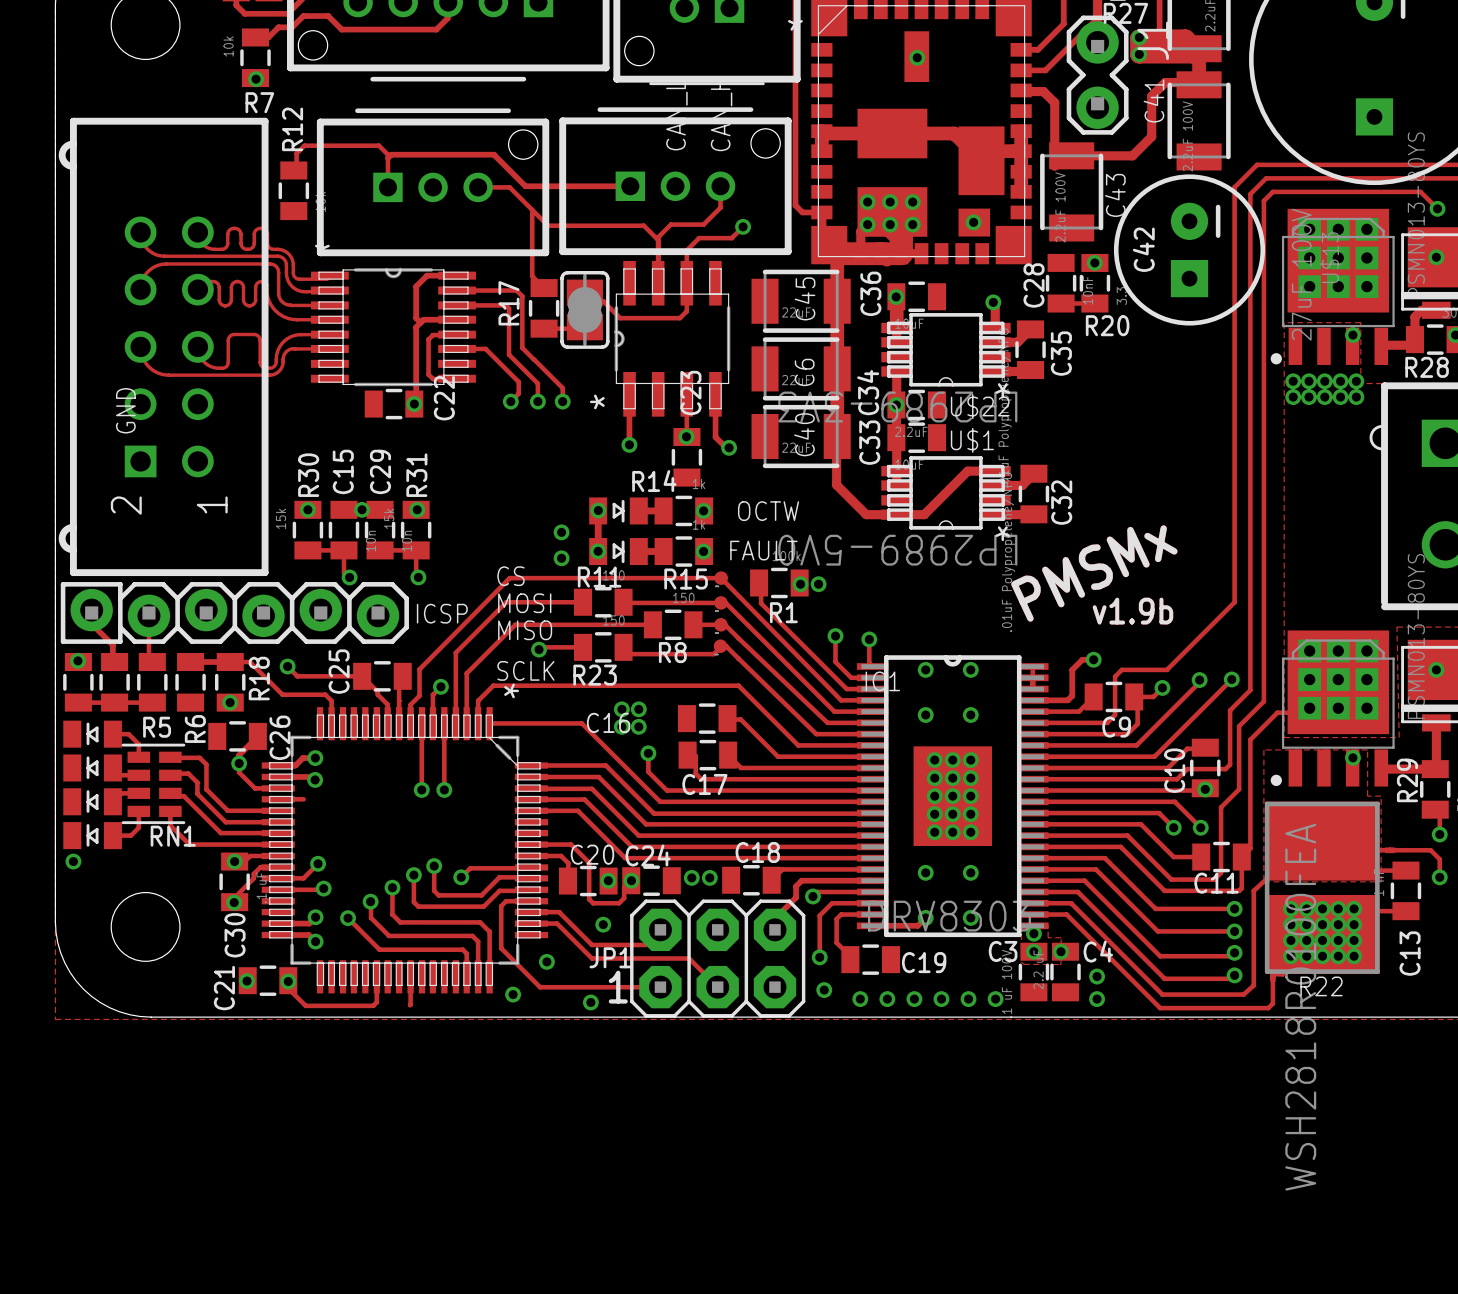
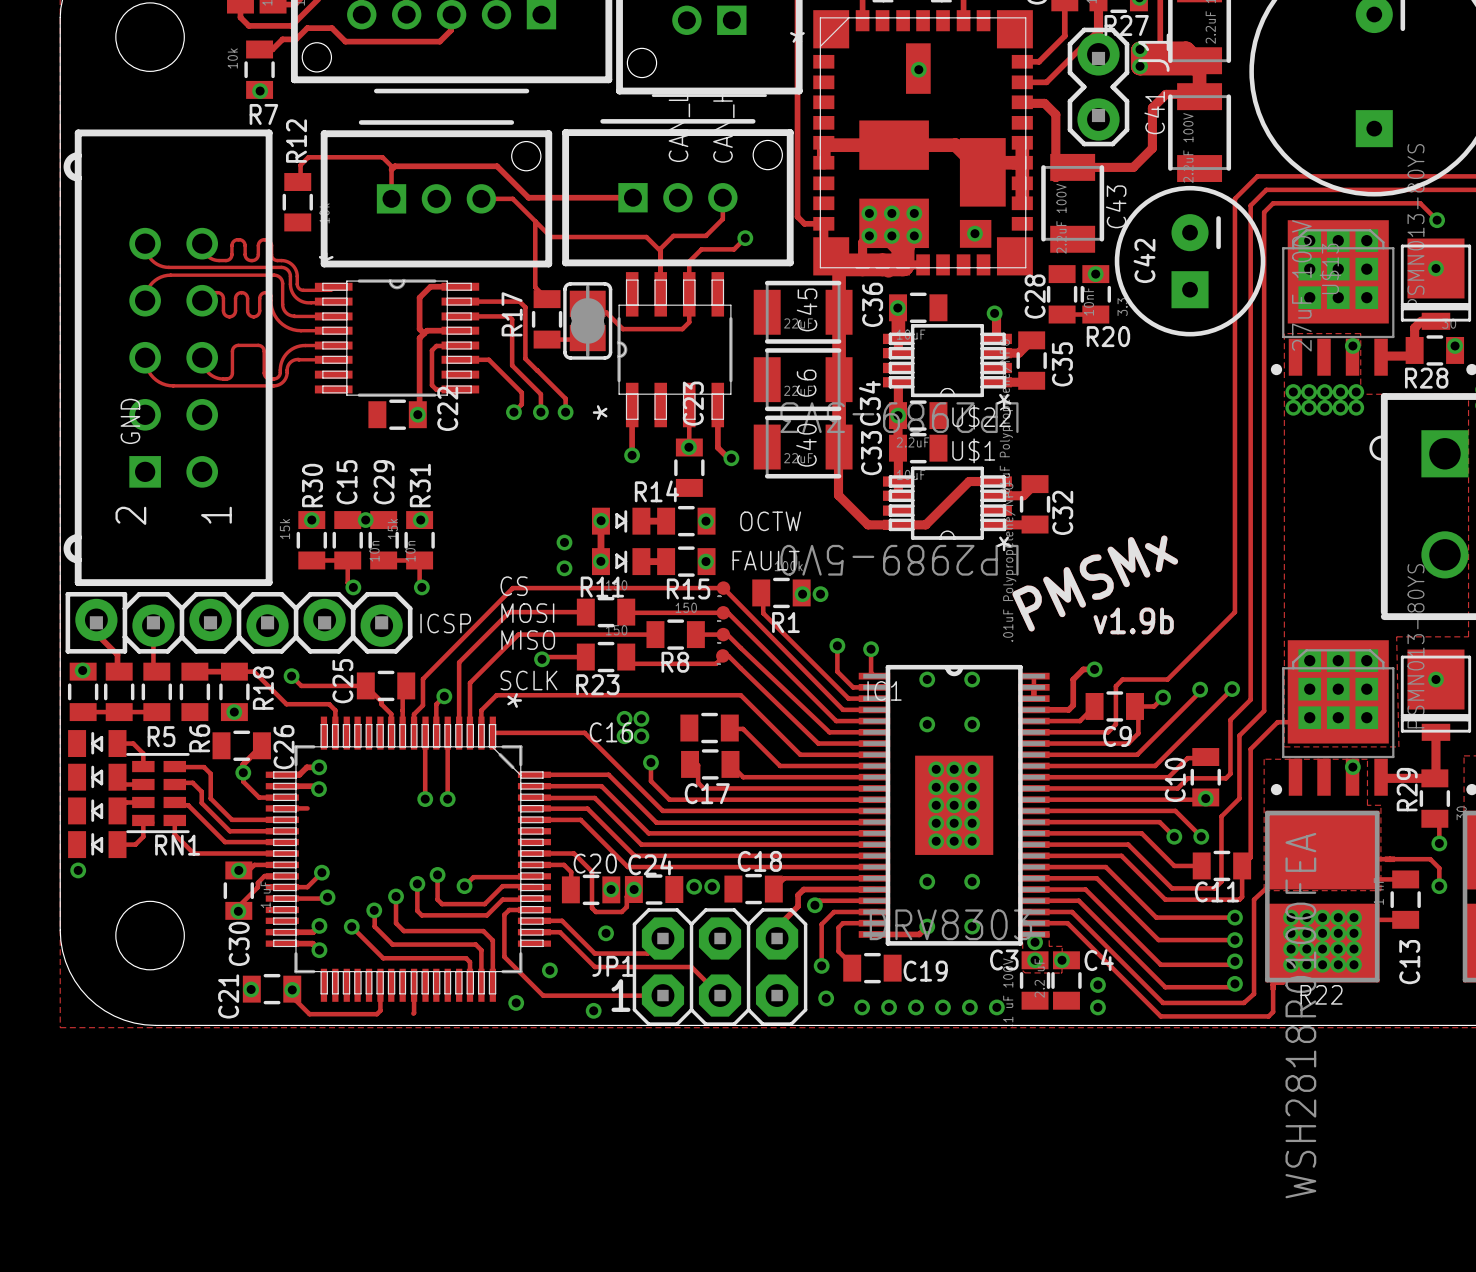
R14 value: 1k (699, 484) -> none
R15 value: 1k (699, 524) -> none

